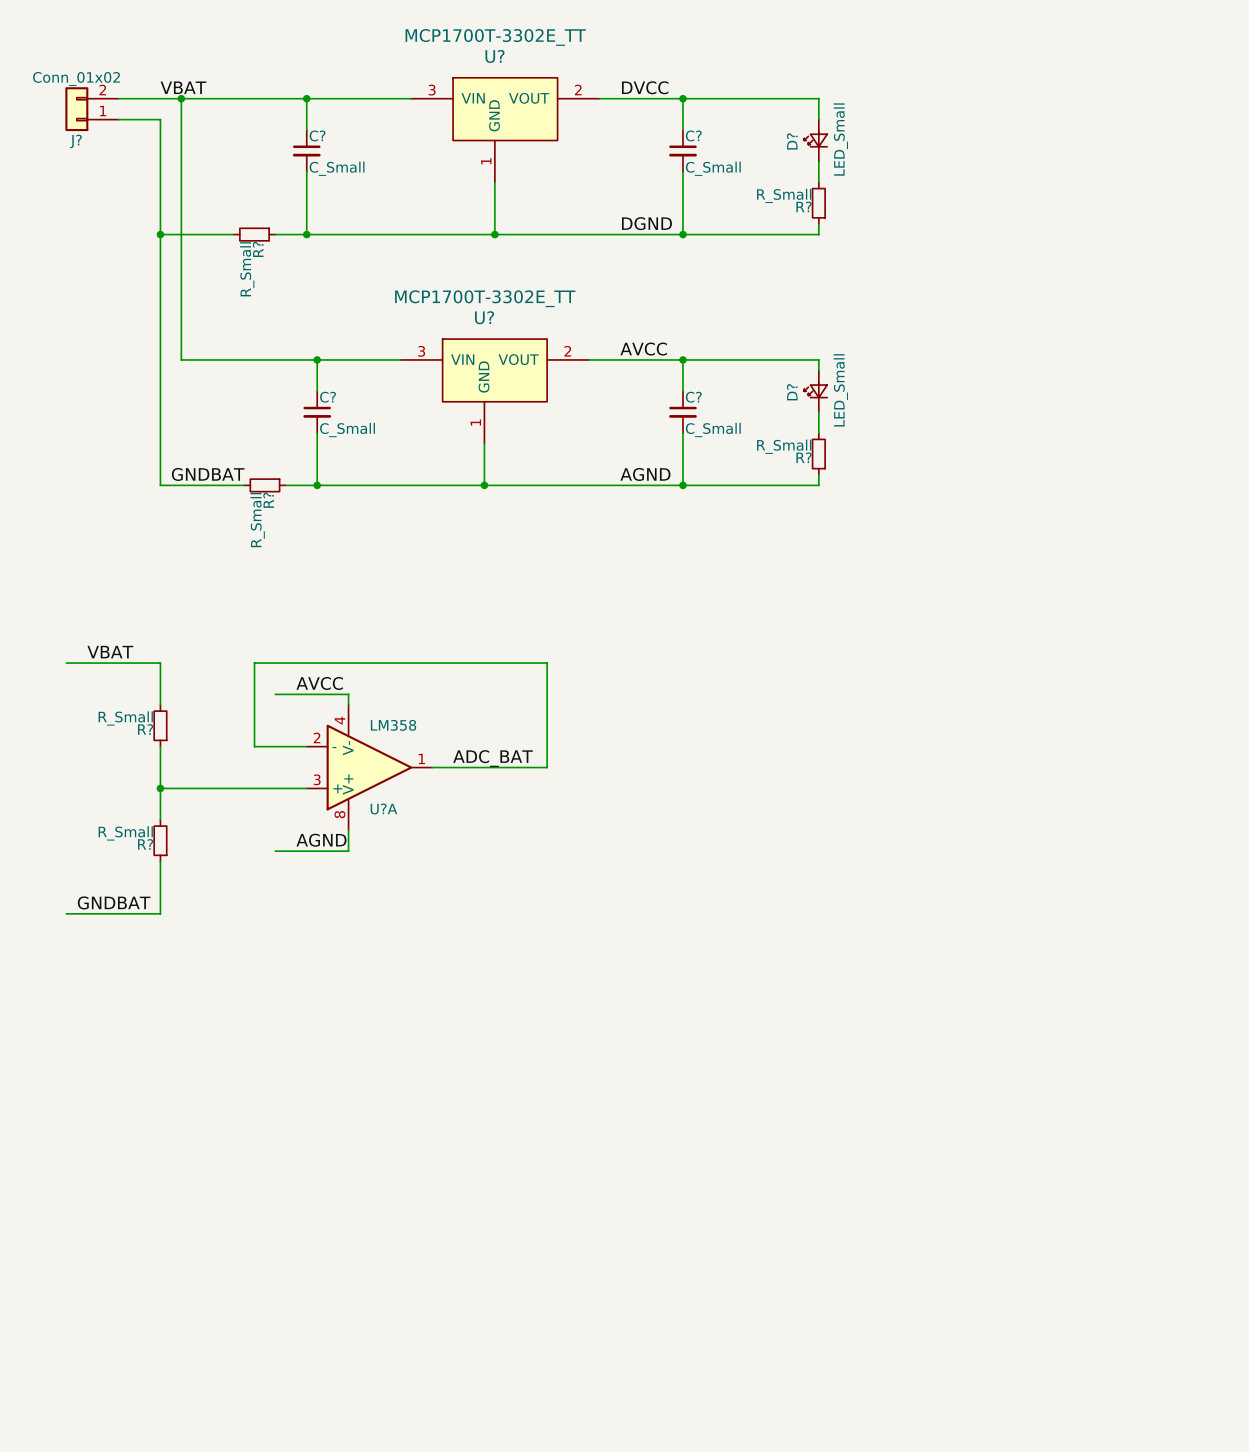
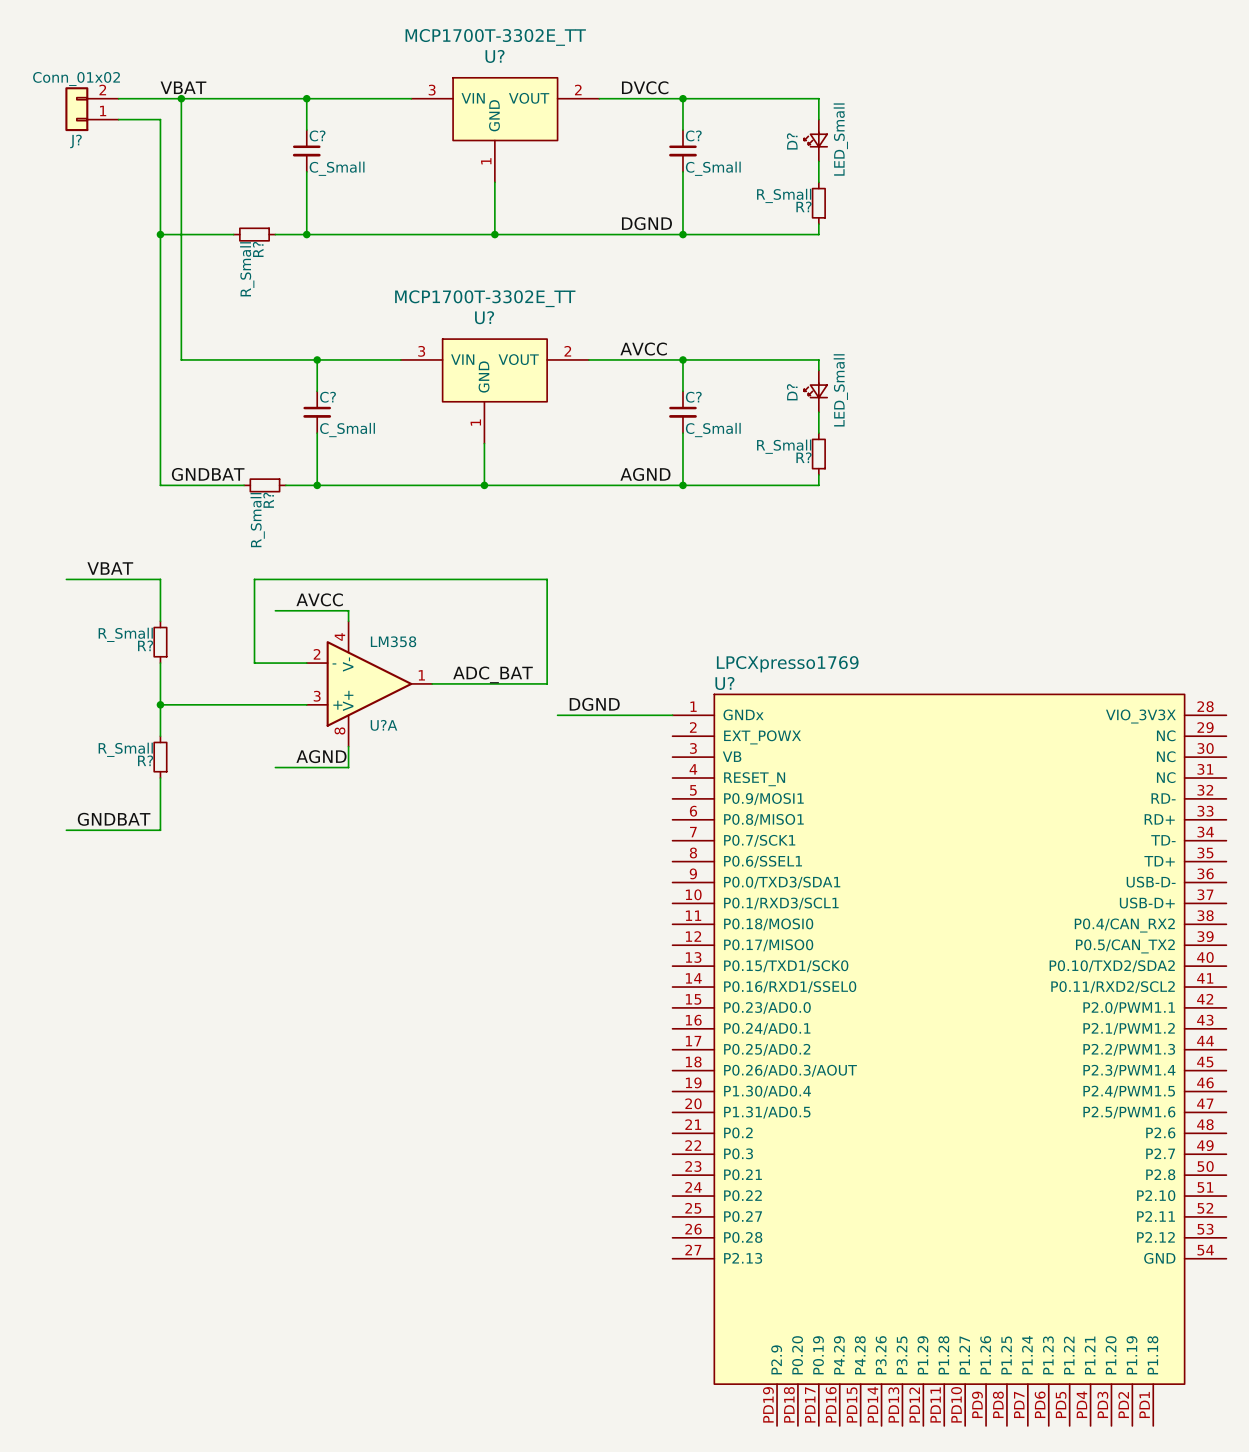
wire: none -> (66, 579) (160, 579) (160, 621)
R?: none -> R_Small (160, 642)
label position: VBAT (110, 652) -> VBAT (110, 568)
wire: (66, 663) (160, 663) -> none
wire: (254, 663) (254, 746) (306, 746) -> none
wire: (306, 663) (547, 663) -> (254, 663) (254, 579) (547, 579) (547, 663)
label position: AVCC (319, 683) -> AVCC (319, 599)
wire: (547, 683) (547, 767) (432, 767) -> (547, 683) (432, 683)
wire: (275, 694) (348, 694) (348, 704) -> (275, 610) (348, 610) (348, 621)
junction: none -> (160, 704)
wire: none -> (306, 704) (160, 704) (160, 736)
label: none -> DGND (594, 704)
wire: none -> (557, 715) (672, 715)
R? position: (160, 725) -> (160, 757)
wire: (160, 746) (160, 778) -> none
label position: ADC_BAT (493, 758) -> ADC_BAT (493, 674)
U?A position: (369, 767) -> (369, 683)
wire: (160, 788) (306, 788) -> none
junction: (160, 788) -> none
wire: none -> (160, 819) (160, 830) (66, 830)
wire: (348, 830) (348, 851) (275, 851) -> (348, 746) (348, 767) (275, 767)
R?: R_Small (160, 840) -> none
label position: AGND (321, 840) -> AGND (321, 756)
wire: (160, 861) (160, 913) (66, 913) -> none
label position: GNDBAT (114, 902) -> GNDBAT (114, 819)
U?: none -> LPCXpresso1769 (949, 1060)

